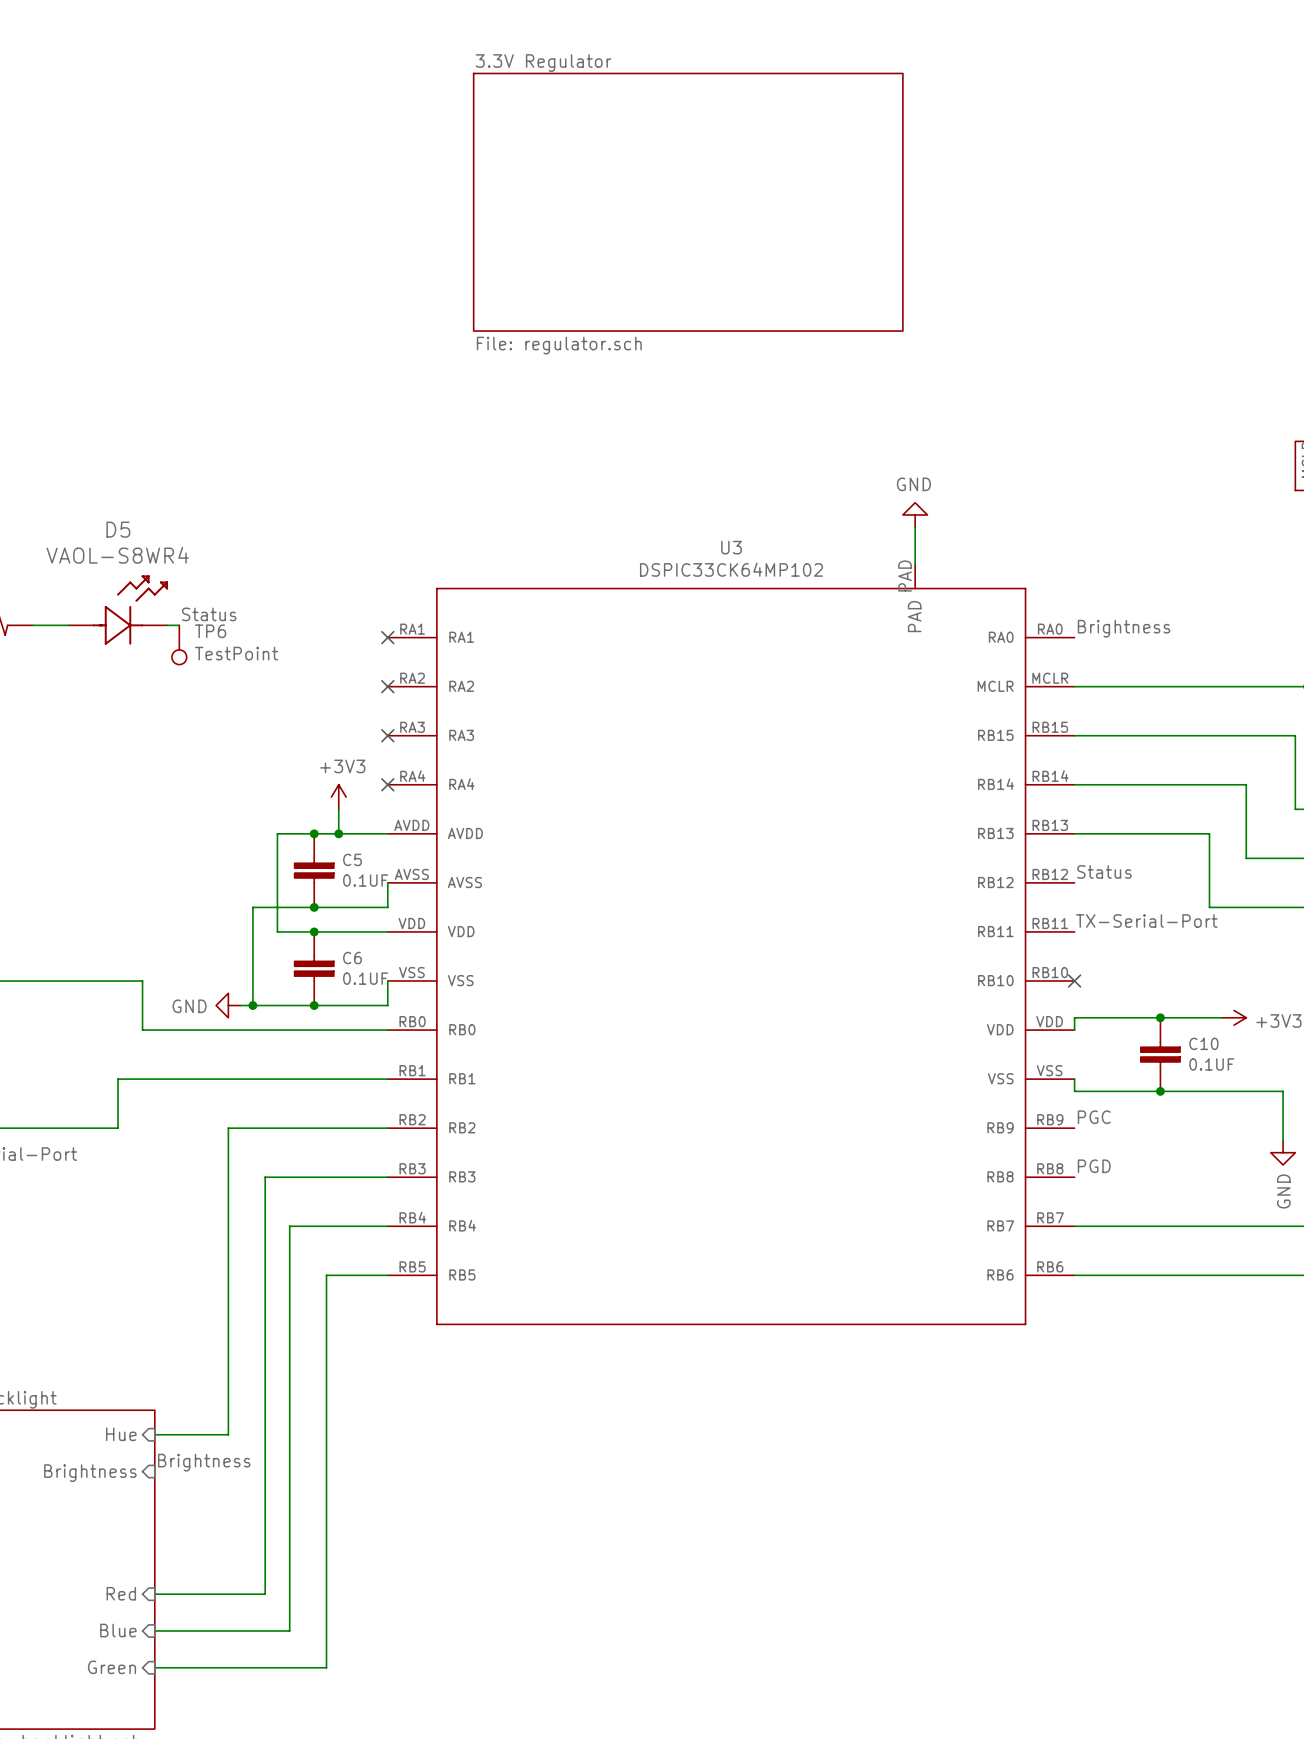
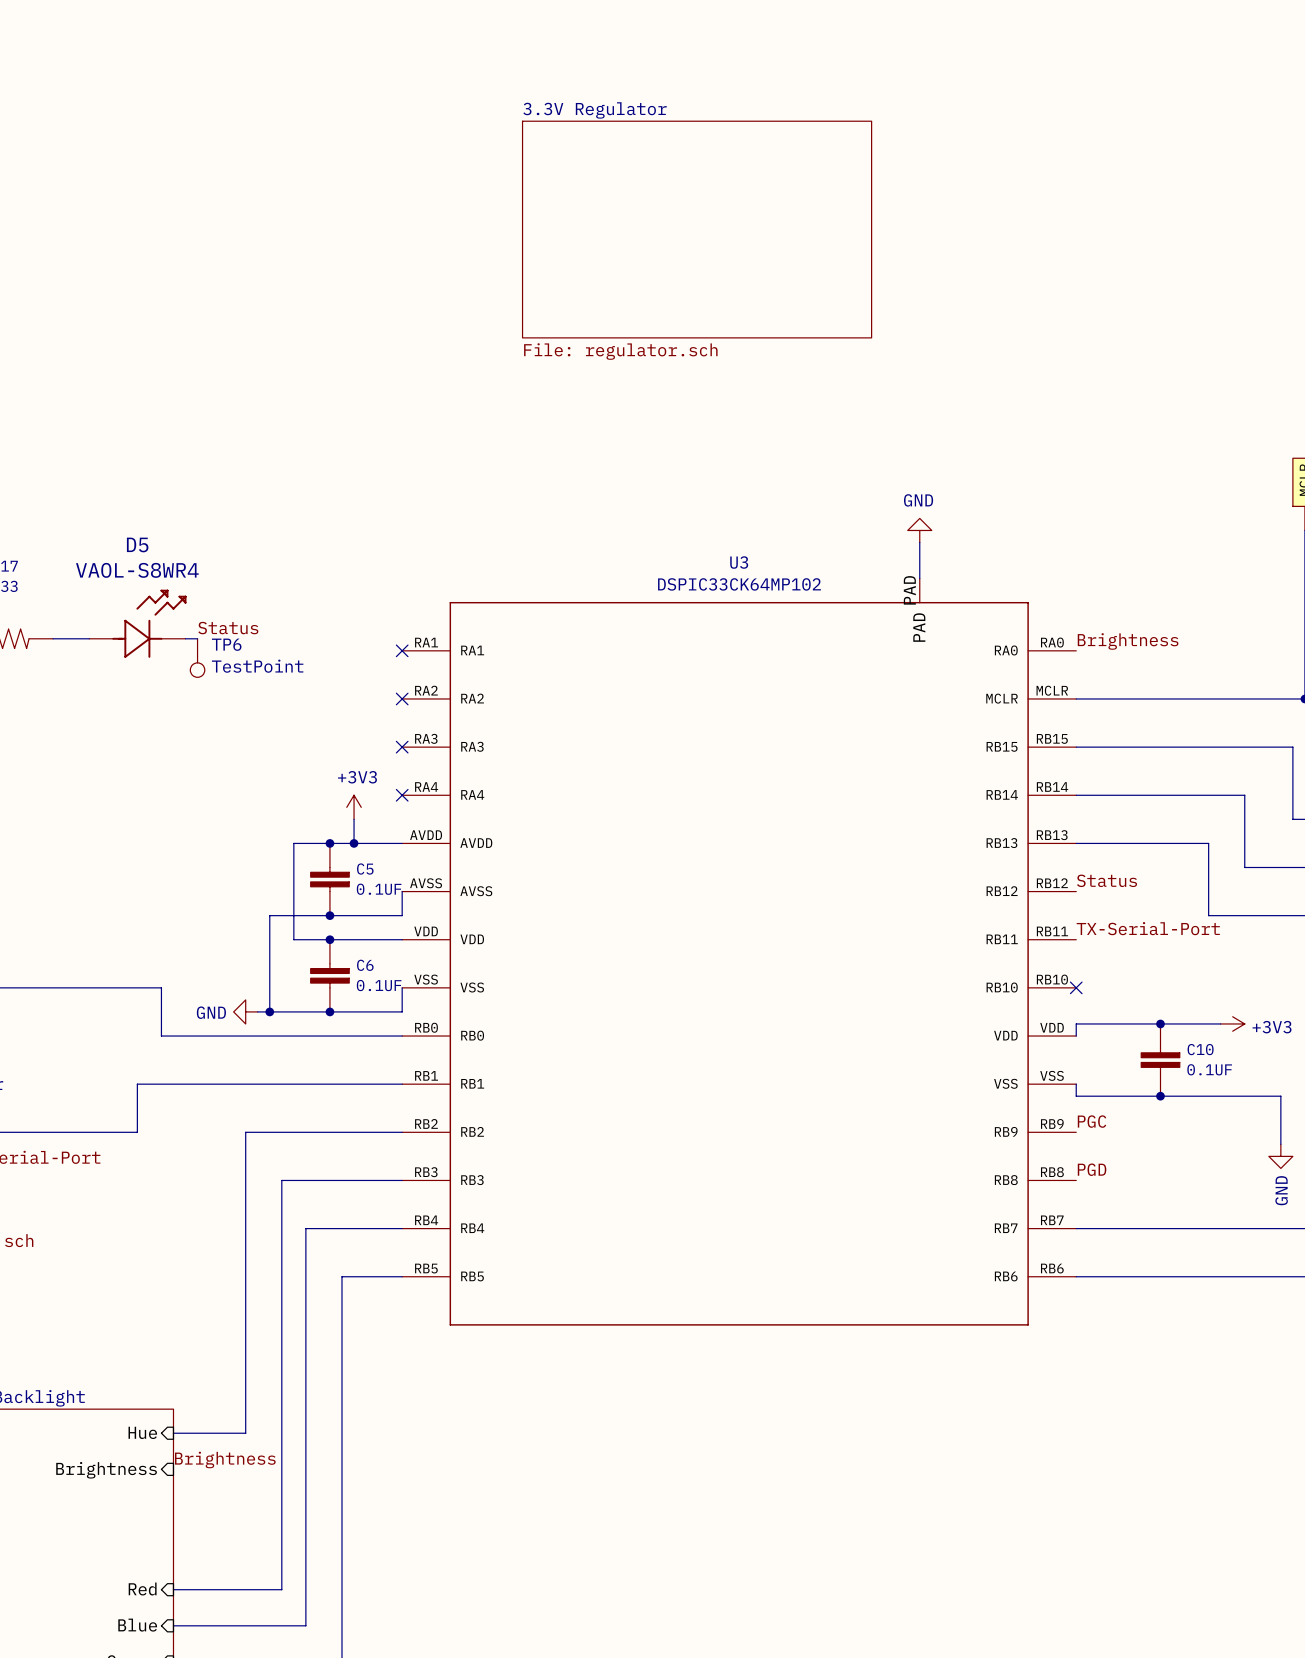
sheet 3.3V Regulator name position: 3.3V Regulator (543, 63) -> 3.3V Regulator (595, 110)
sheet 3.3V Regulator shape: [473, 73, 903, 332] -> [522, 121, 872, 338]
sheet 3.3V Regulator value position: File: regulator.sch (559, 345) -> File: regulator.sch (620, 351)

